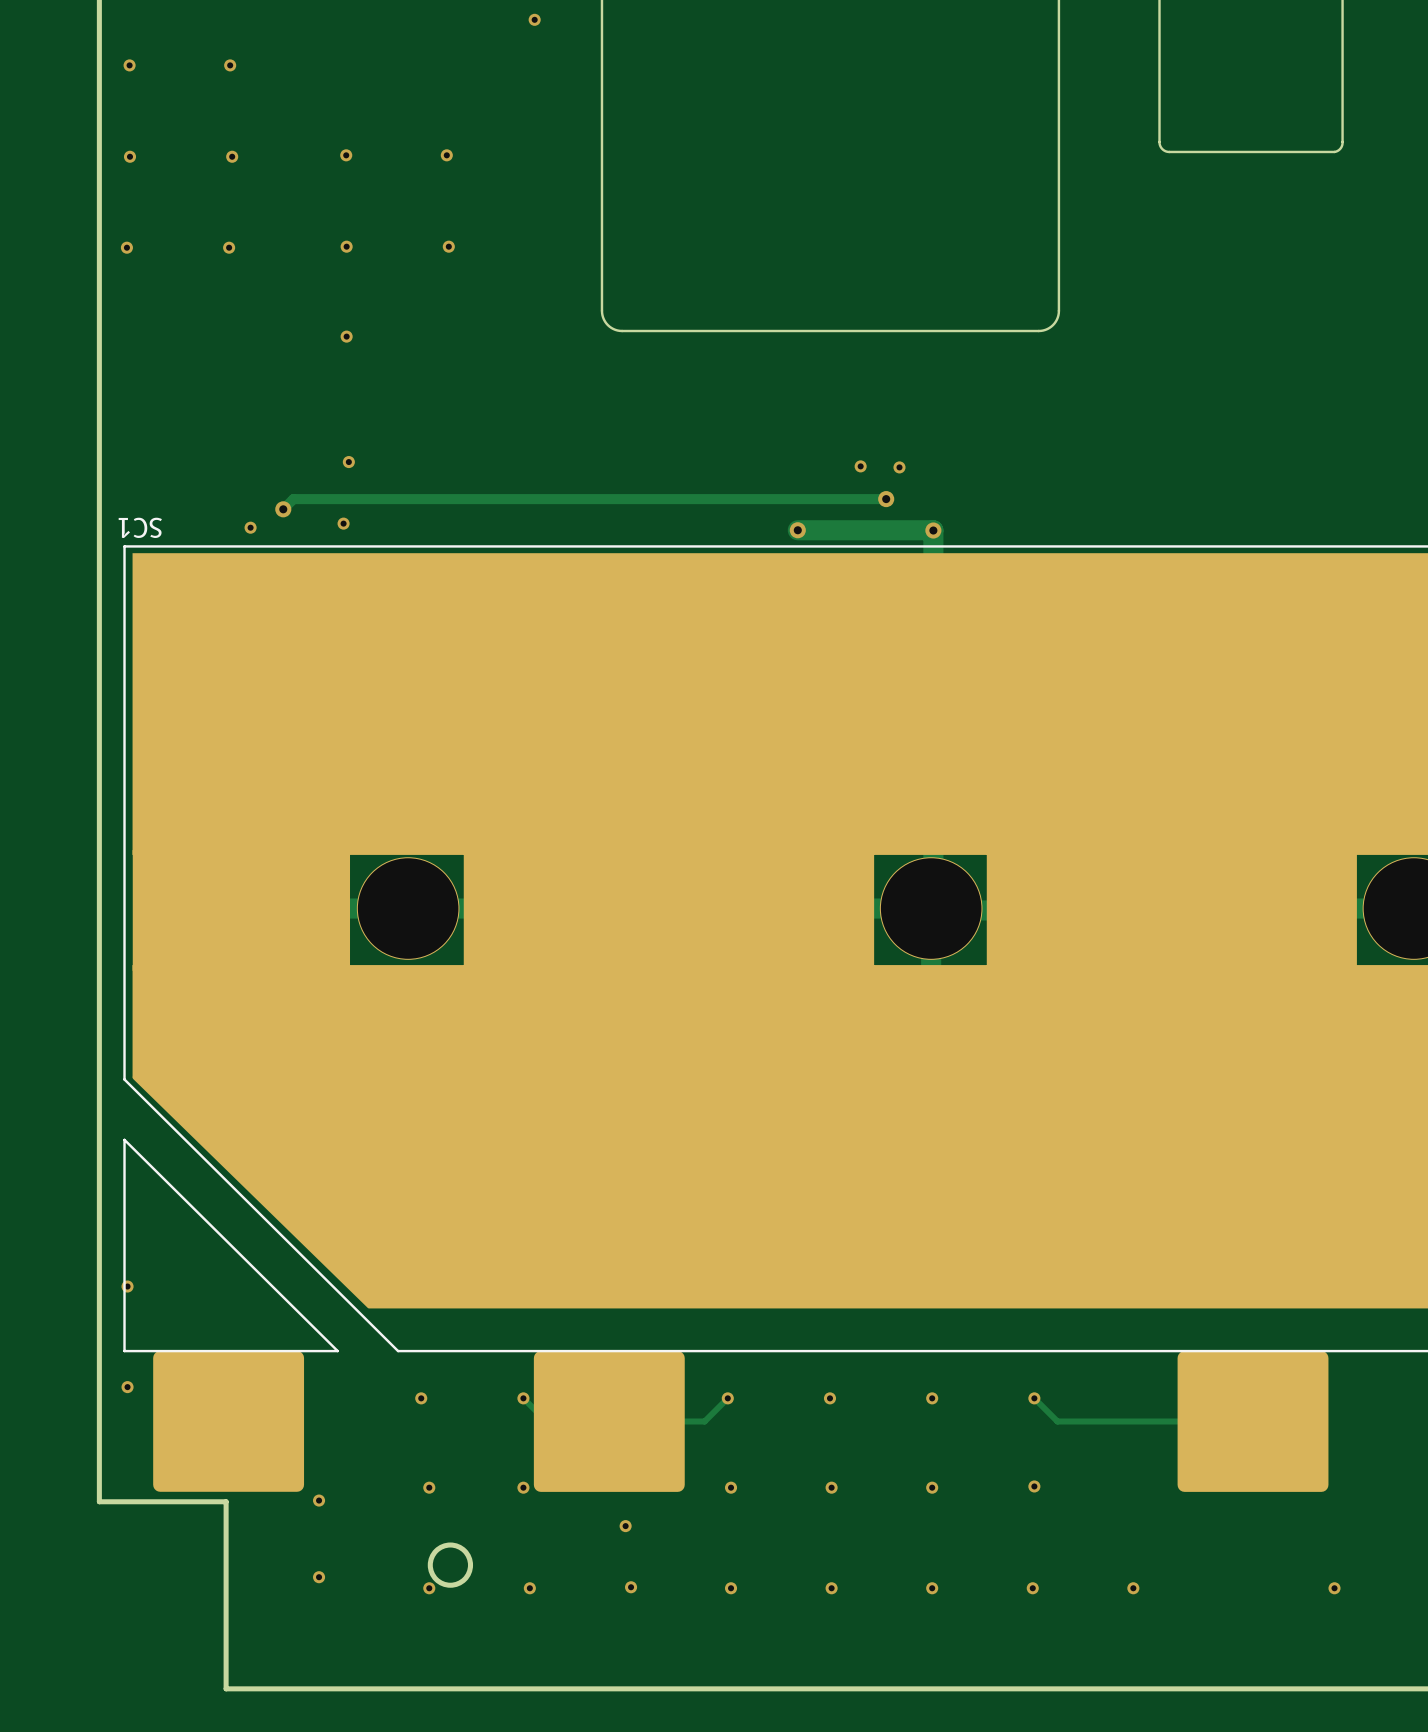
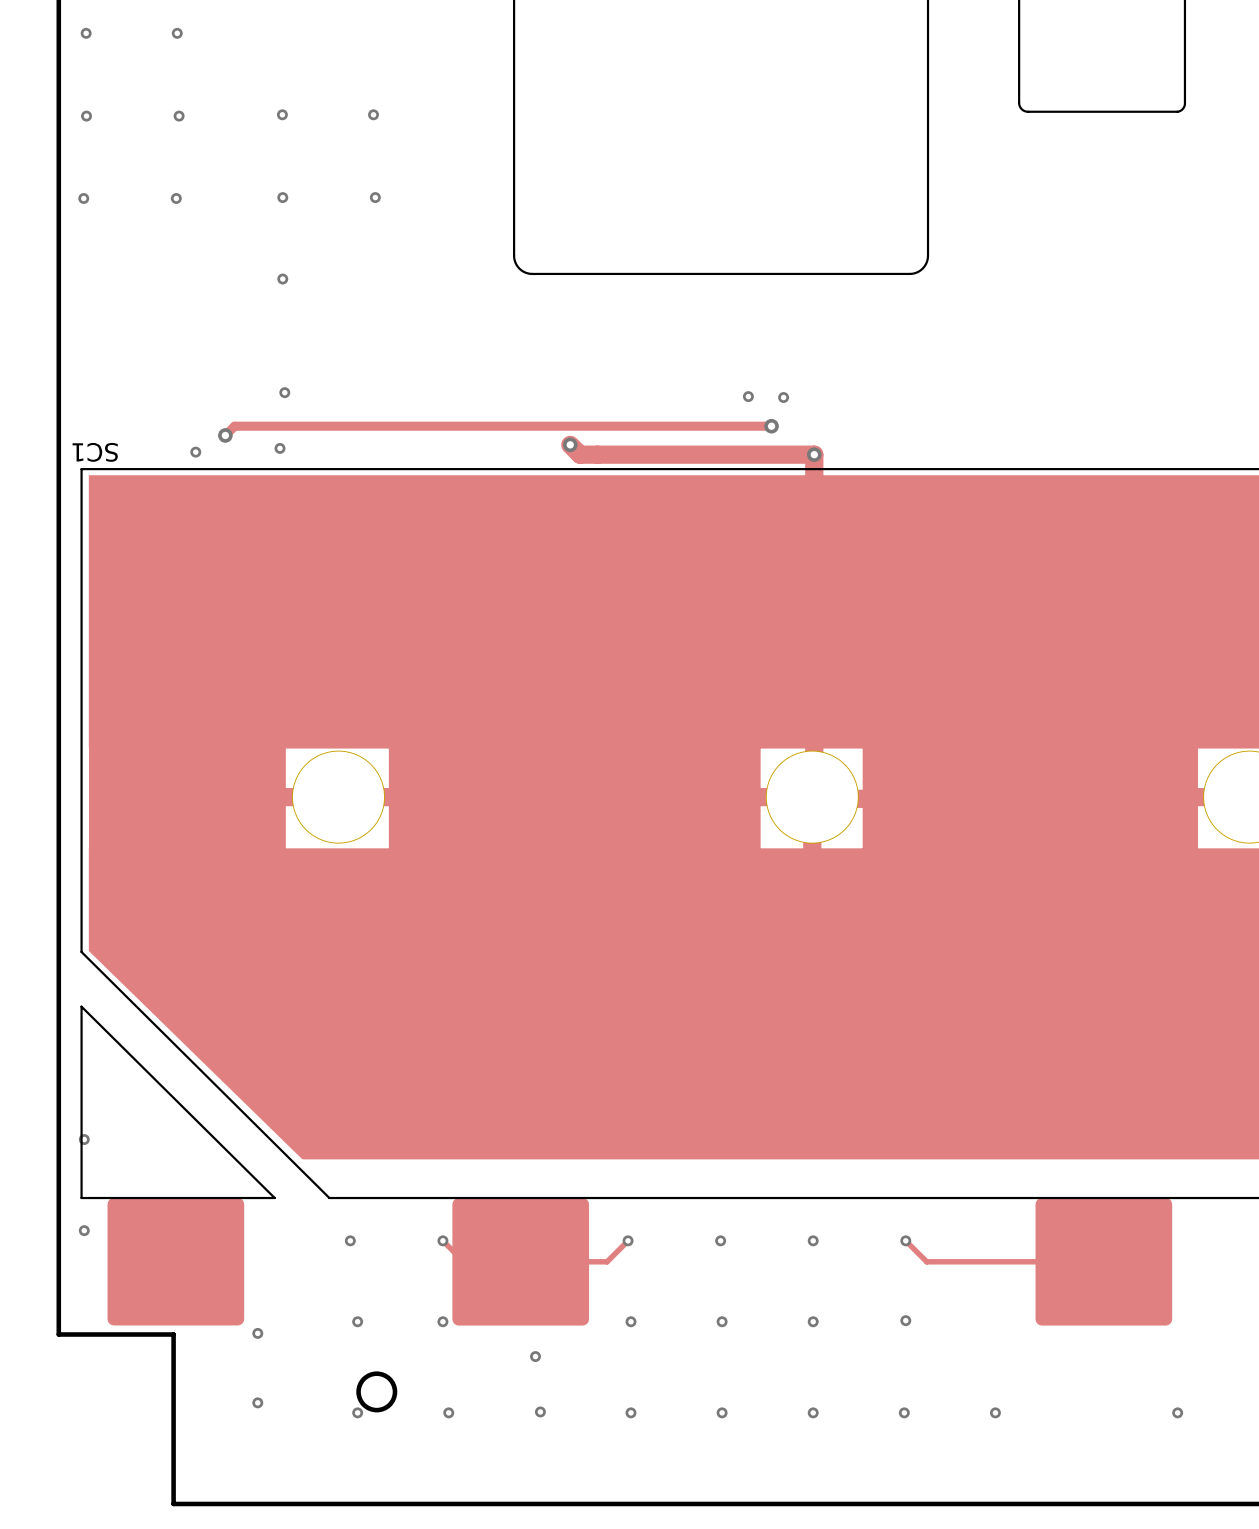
via: none -> (570, 444)
track: (797, 530) (933, 530) -> (570, 444) (580, 454) (814, 454)
via: (797, 530) -> none

